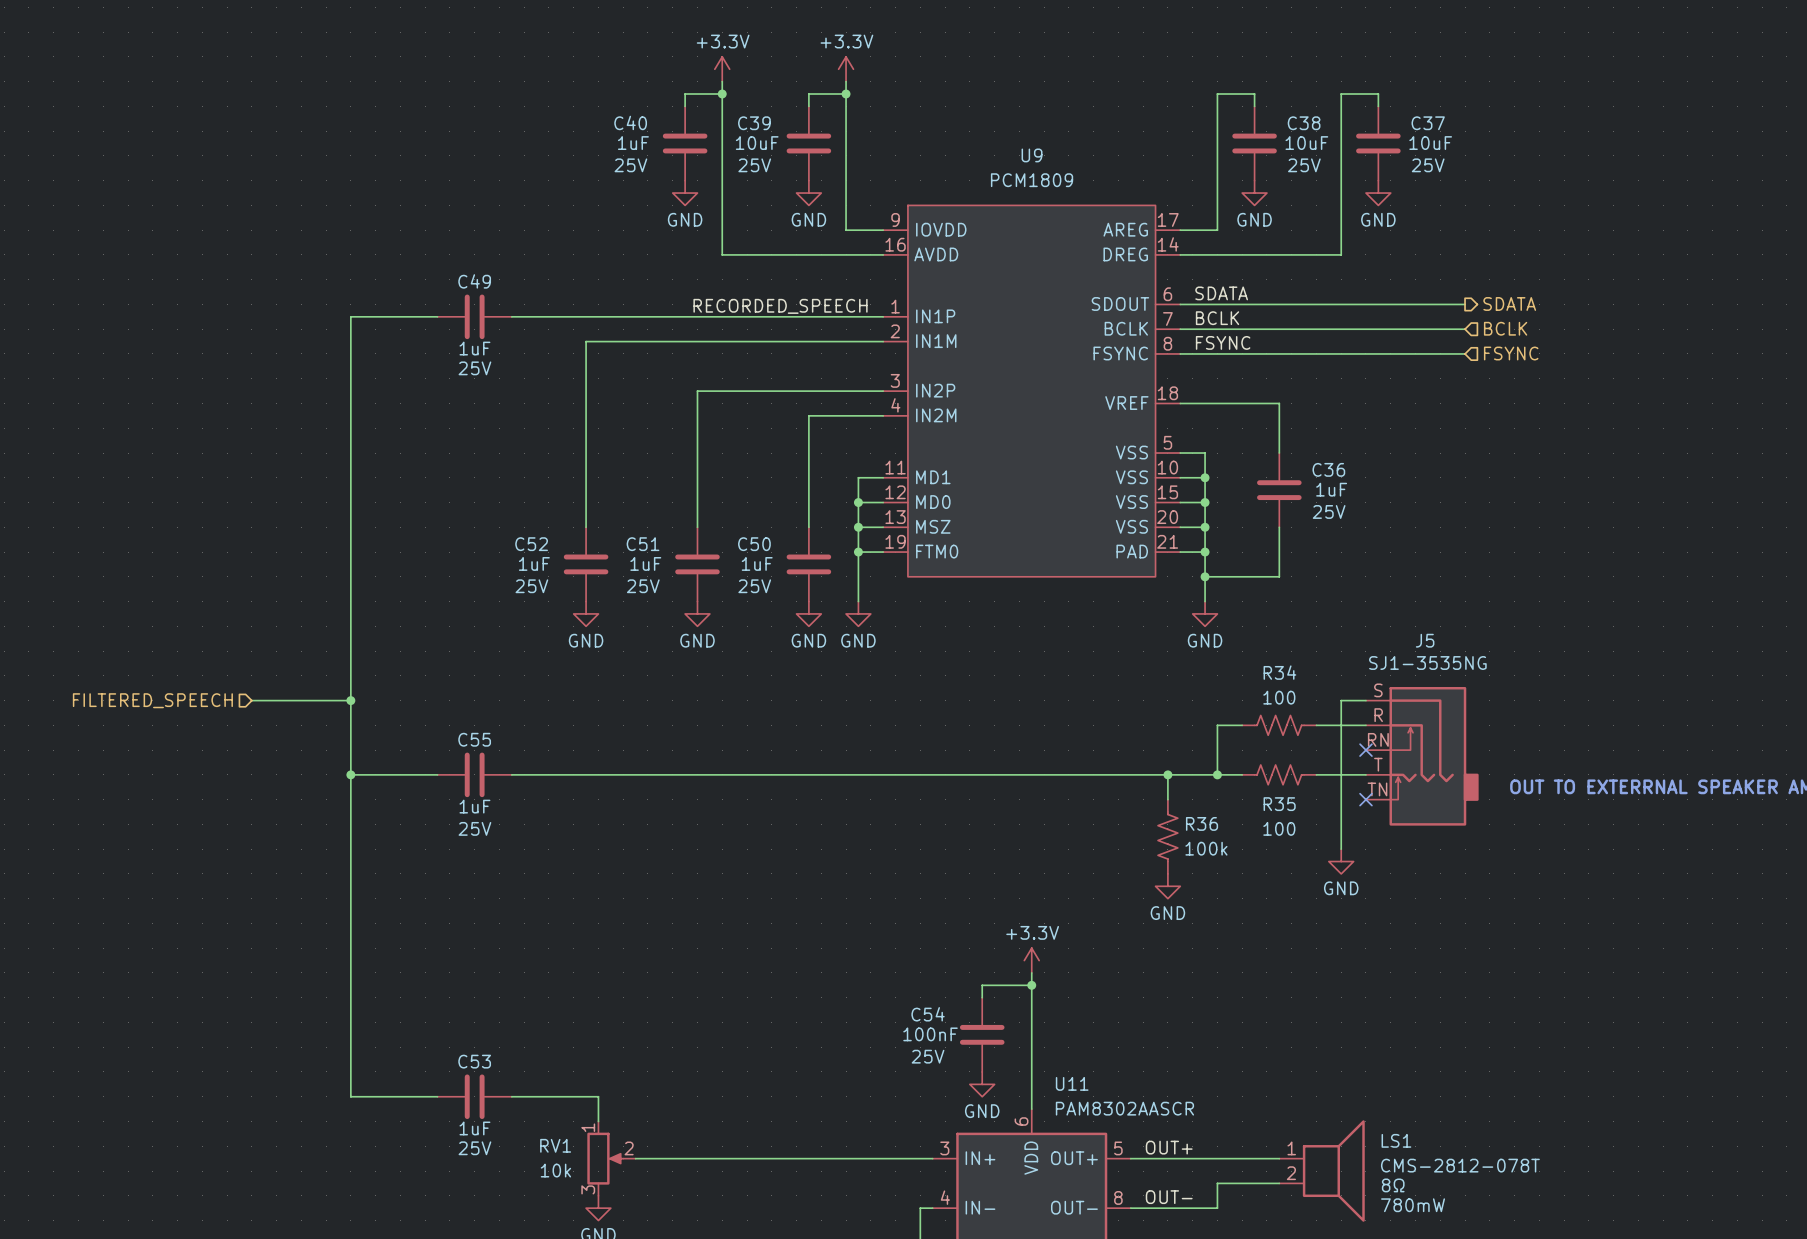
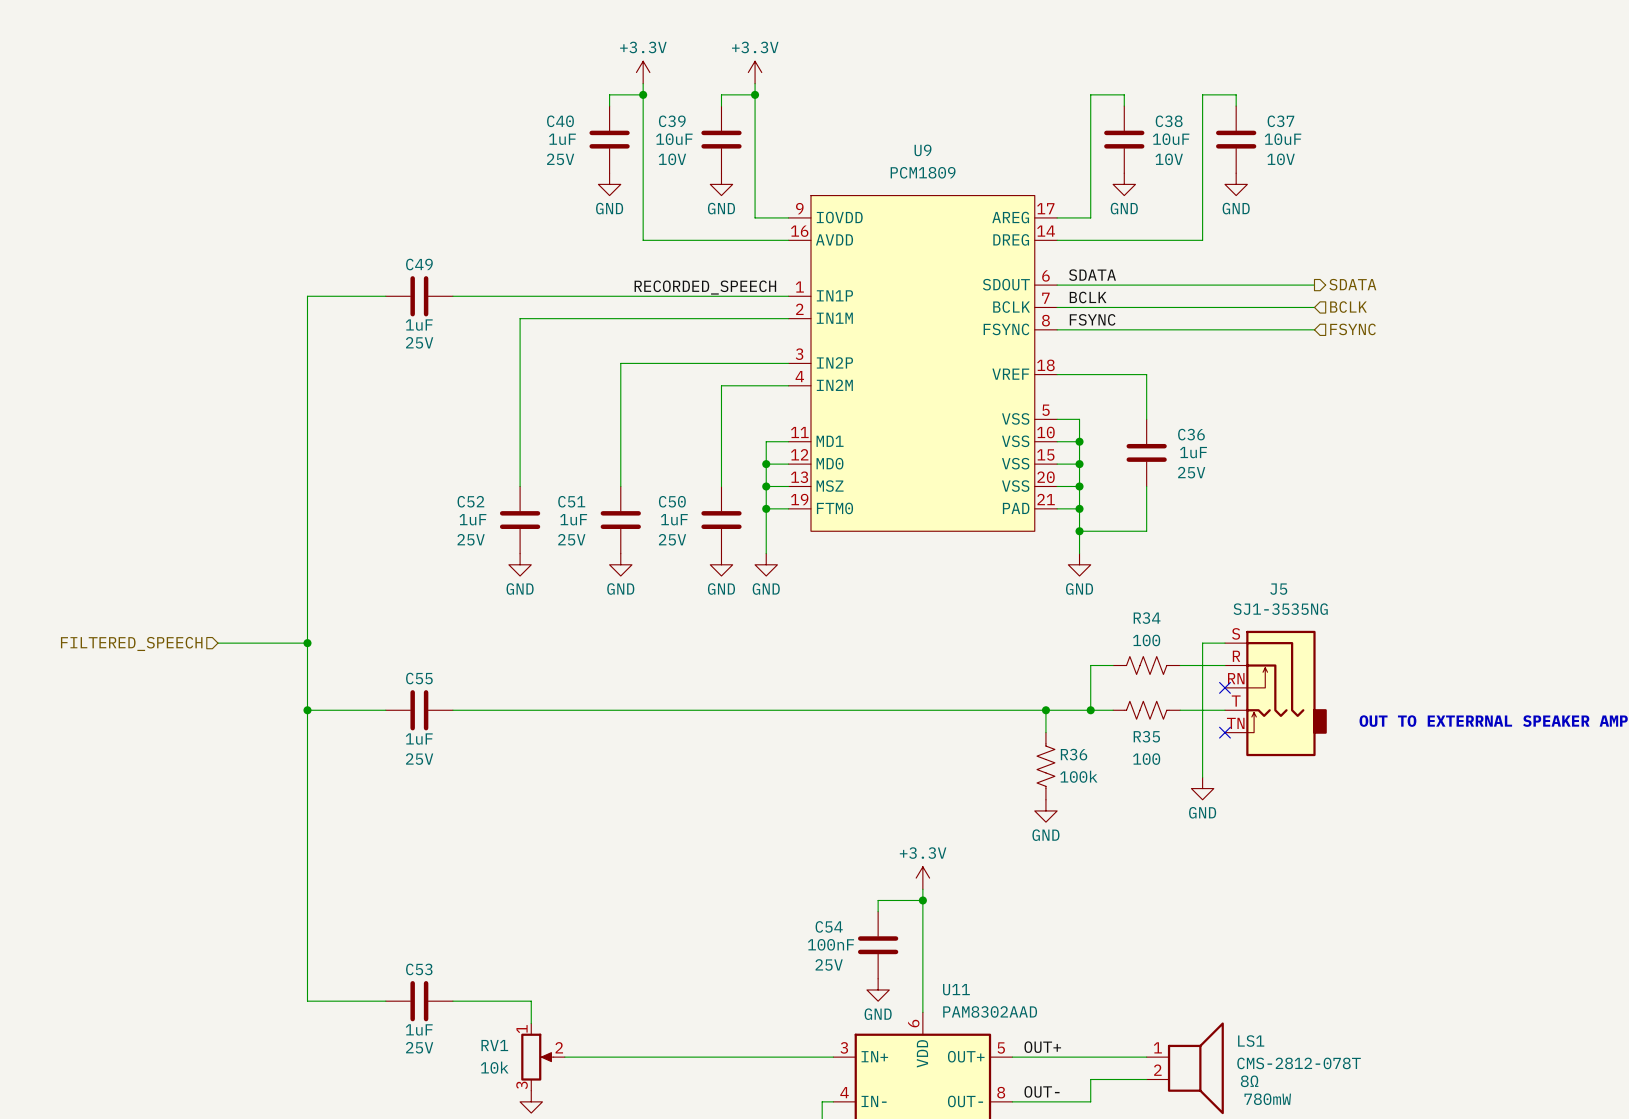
C39 text: 25V (754, 165) -> 10V (672, 159)
C38 text: 25V (1304, 165) -> 10V (1169, 159)
C37 text: 25V (1428, 165) -> 10V (1281, 159)
U11 value: PAM8302AASCR (1124, 1108) -> PAM8302AAD (990, 1011)

